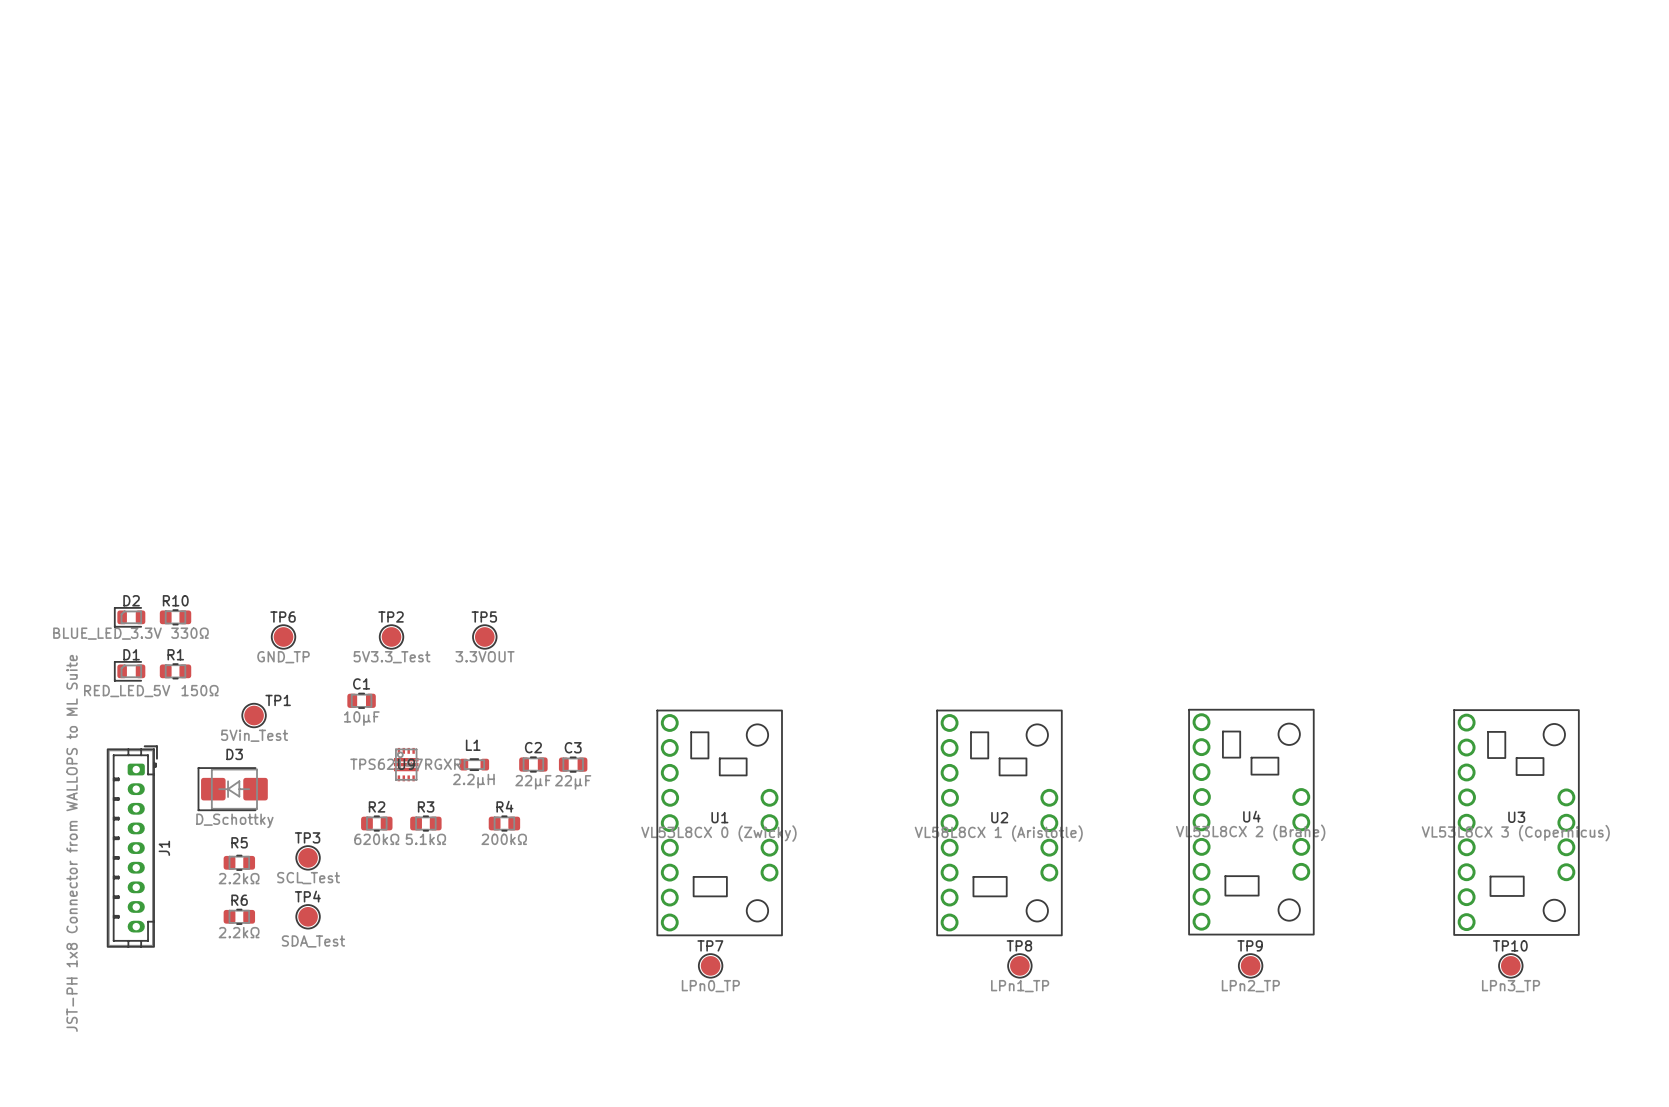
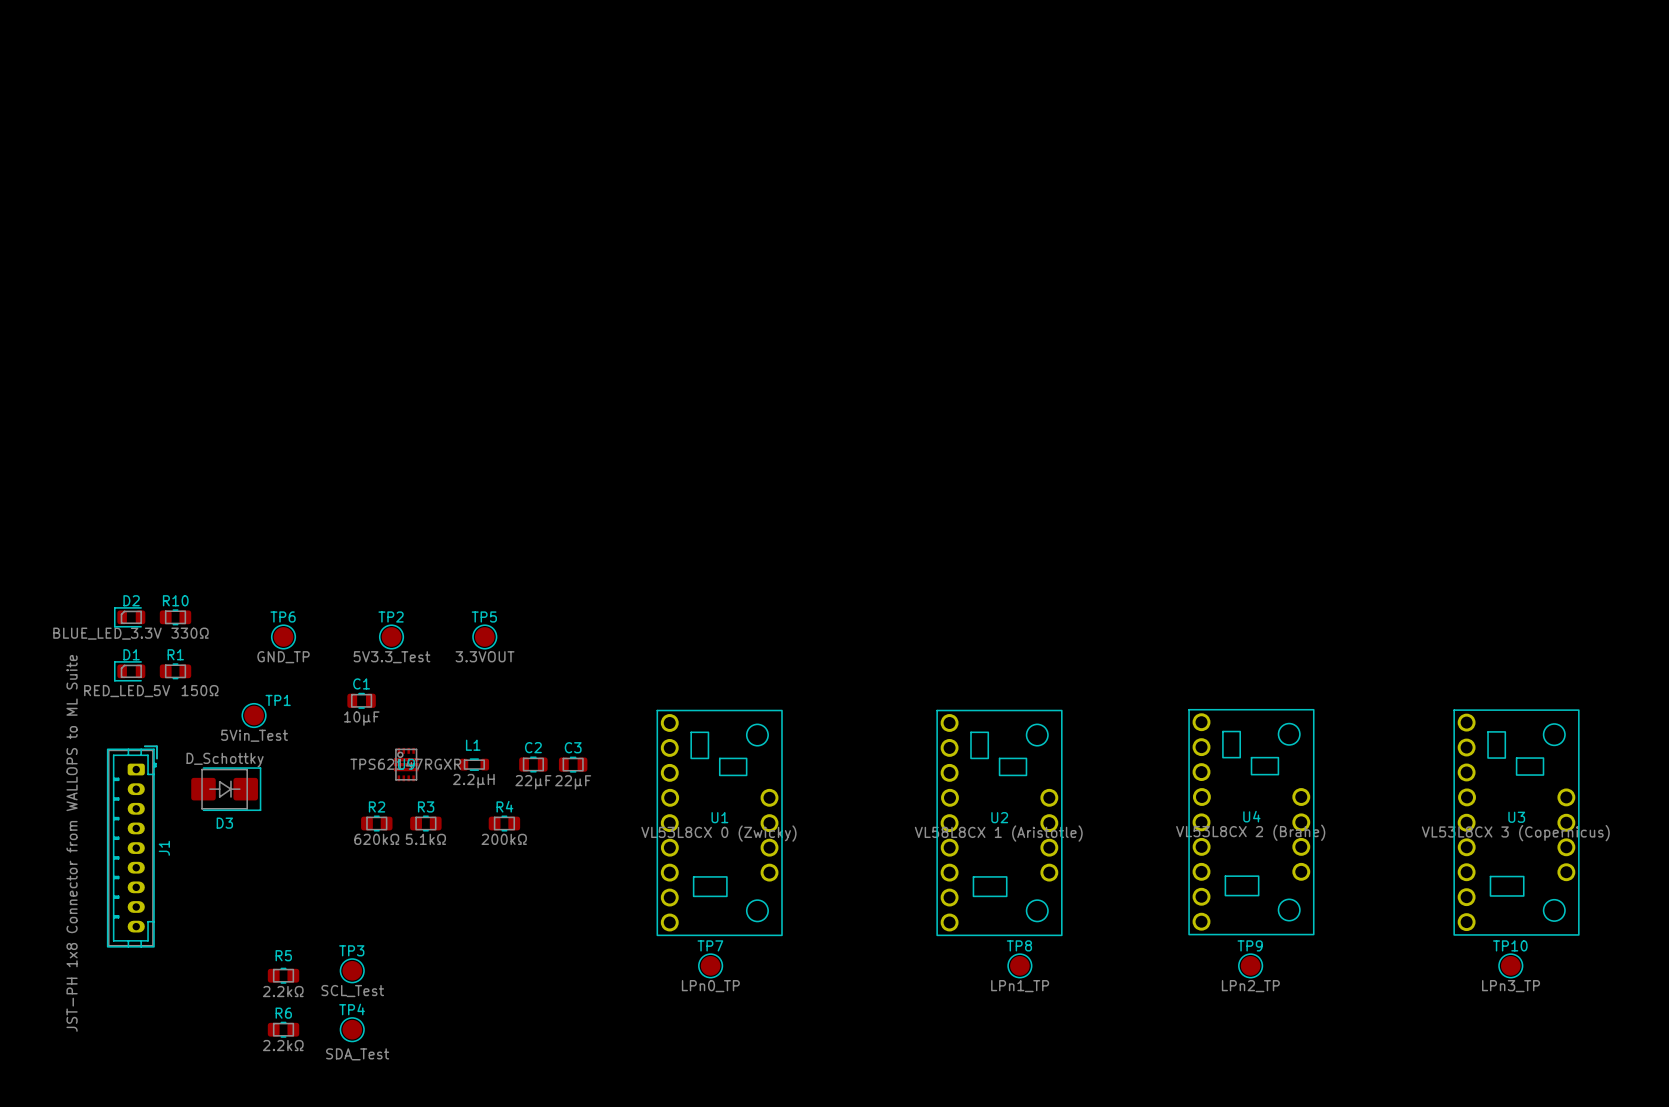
D3 rotation: 0° (232, 789) -> 180° (226, 789)
TP3 position: (308, 857) -> (352, 970)
R5 position: (239, 862) -> (283, 975)
R6 position: (239, 916) -> (283, 1029)
TP4 position: (308, 916) -> (352, 1029)

